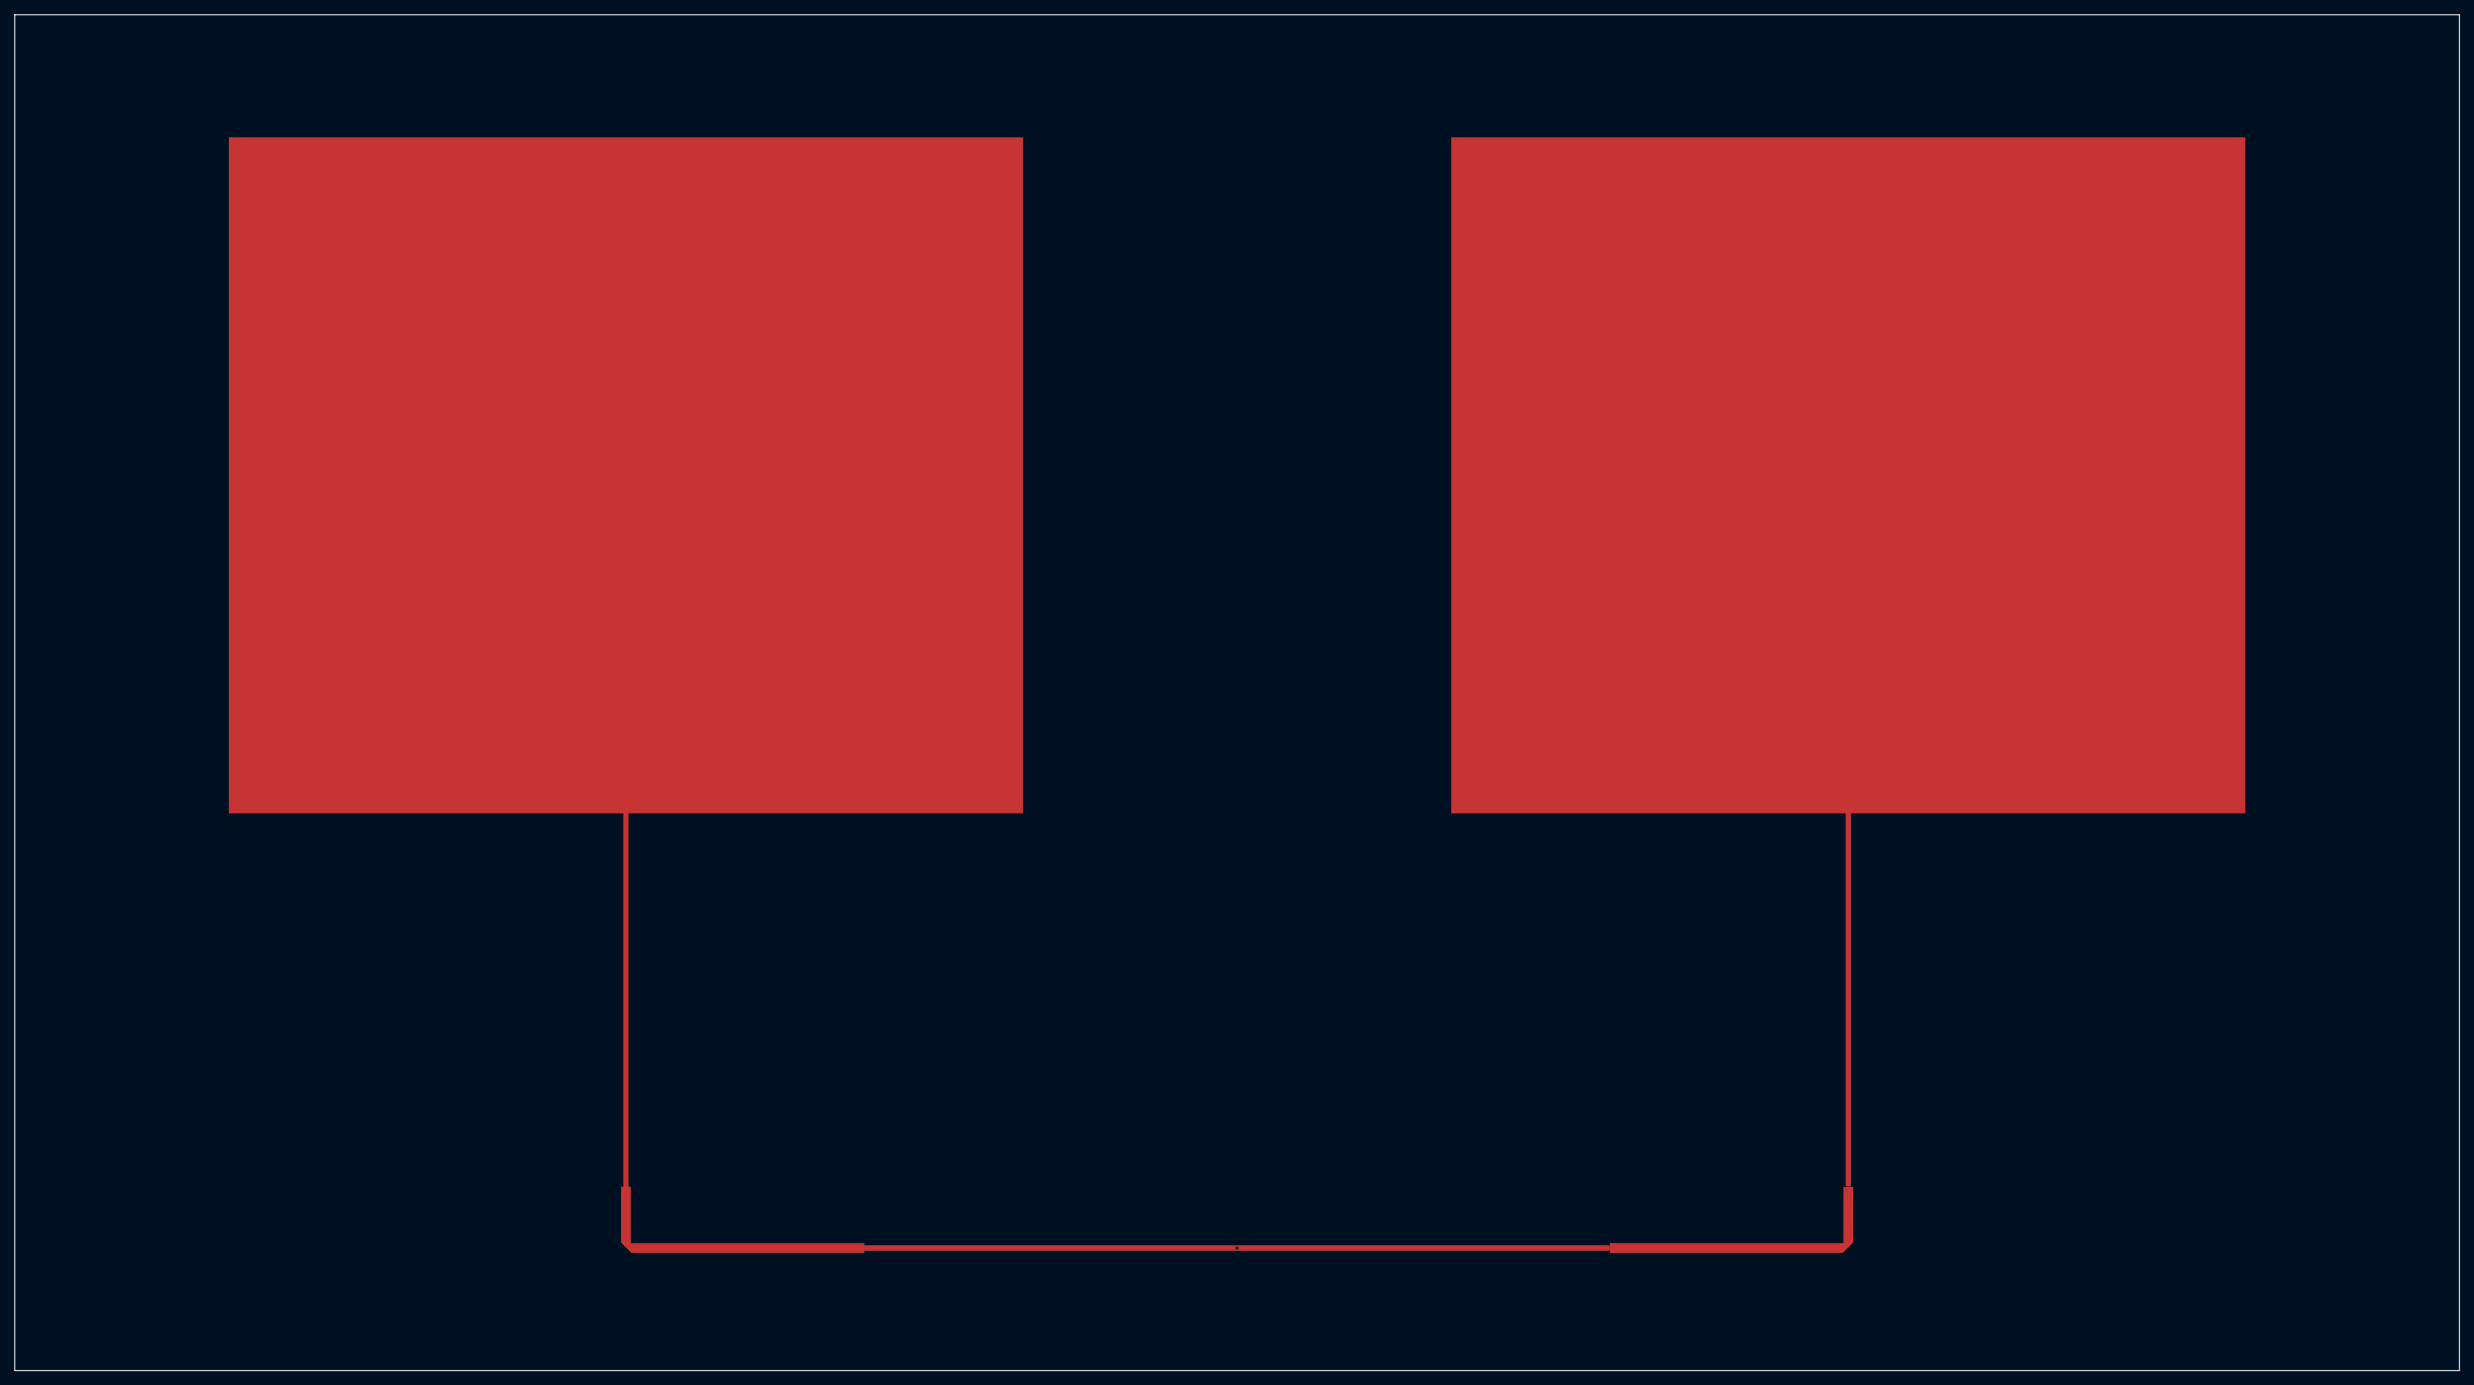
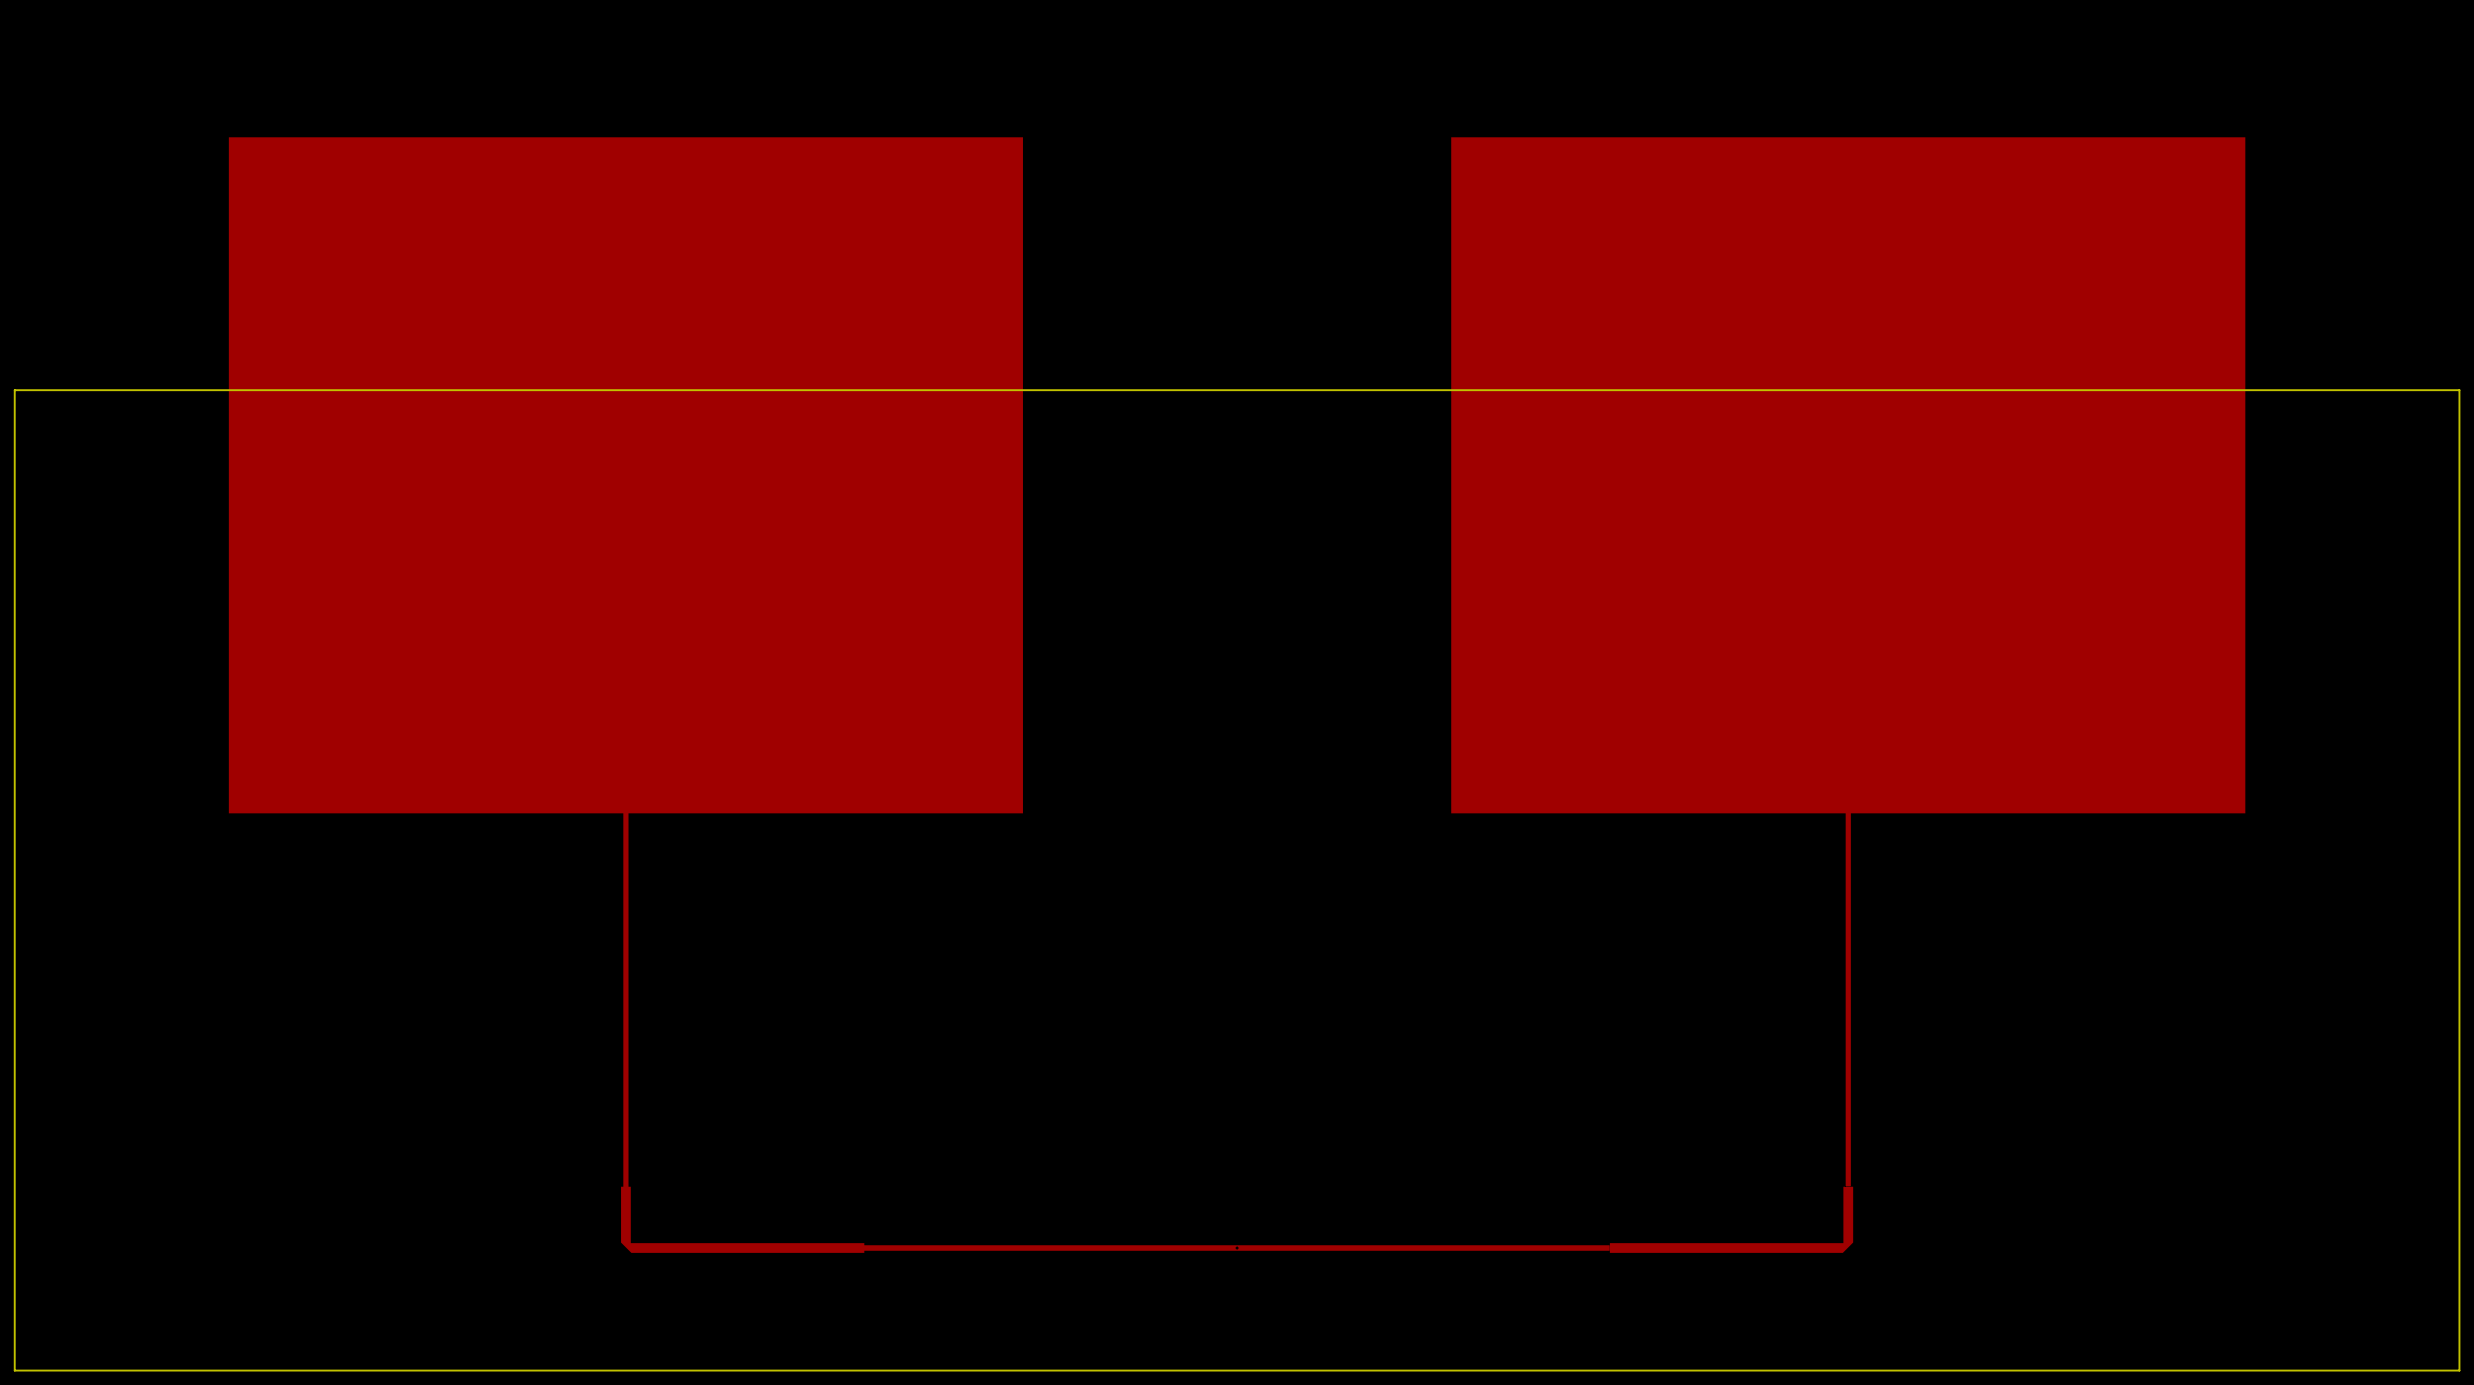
board edge: (14, 390) (14, 14) (2459, 14) (2459, 390) -> (14, 390) (2459, 390)

